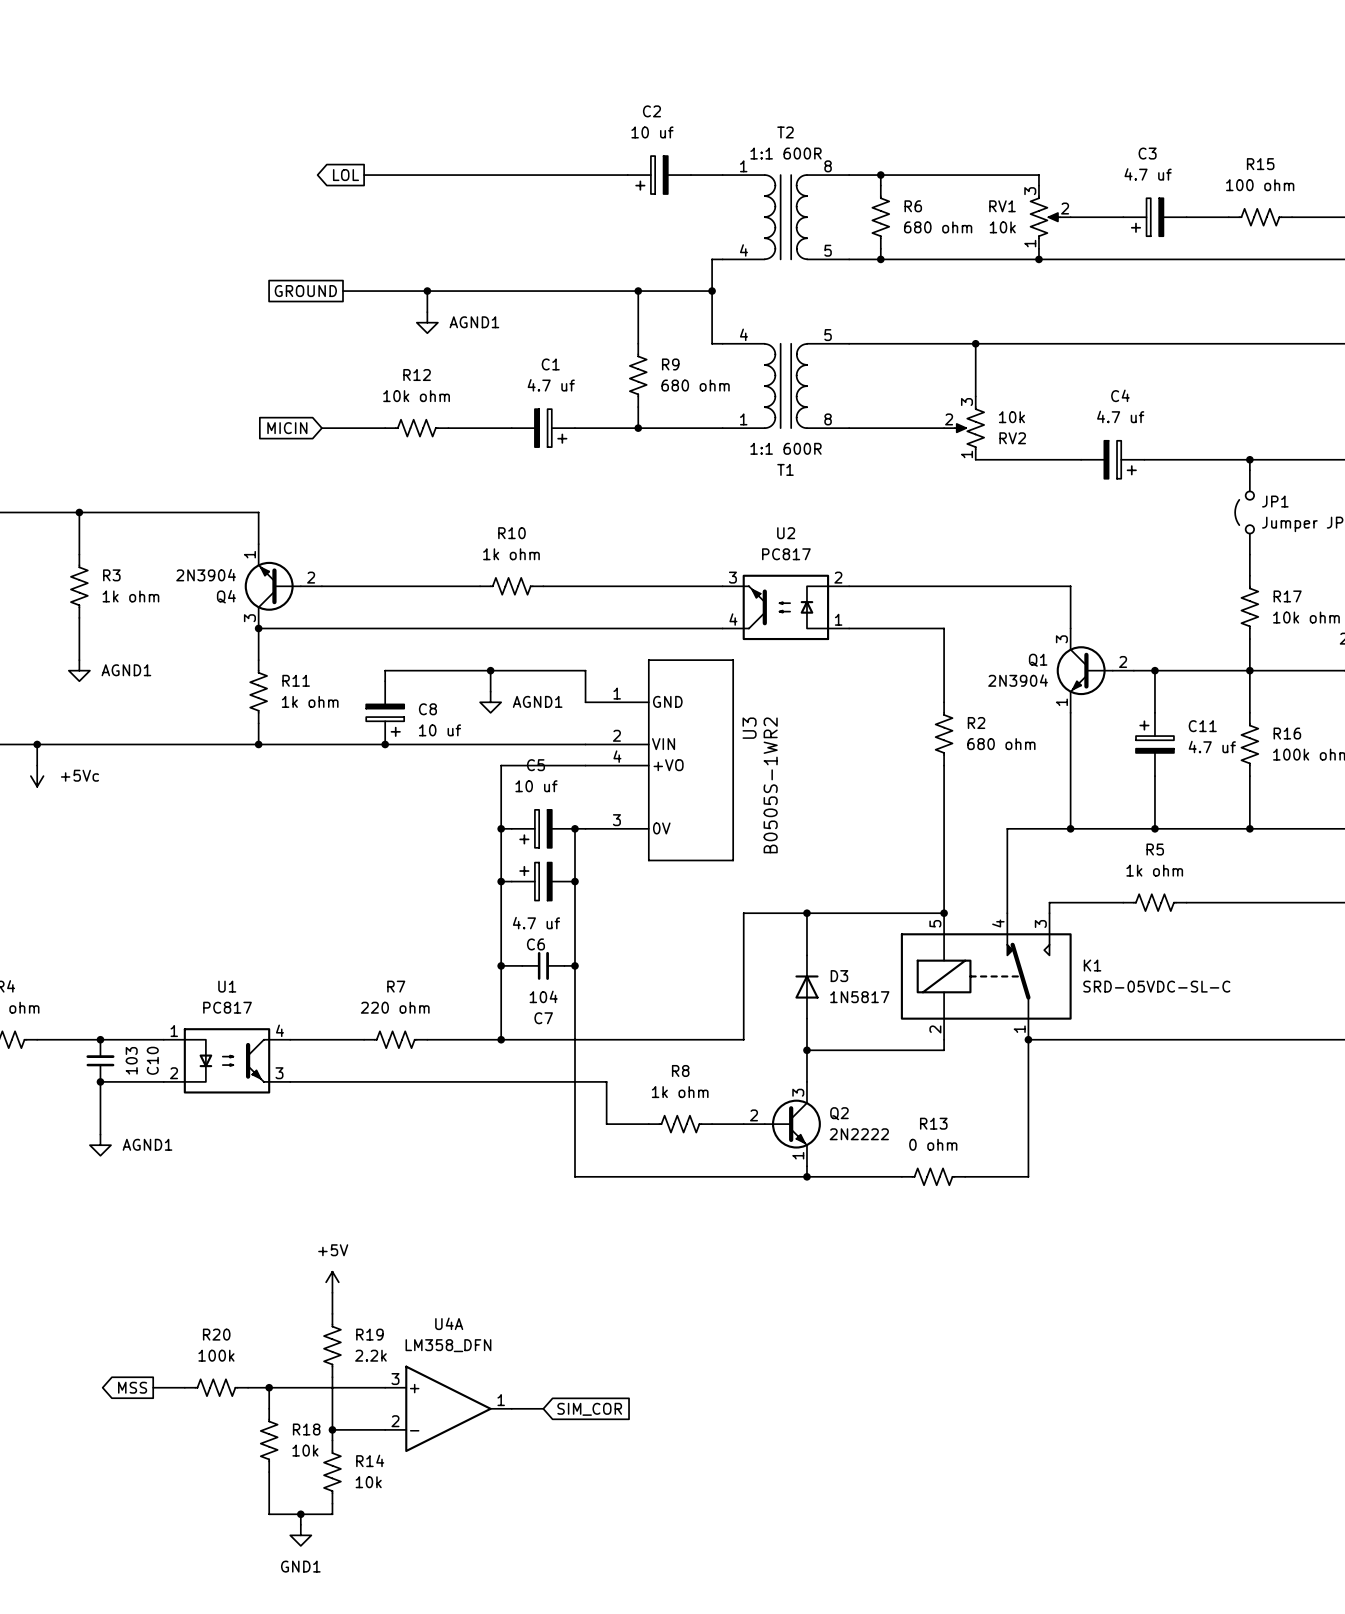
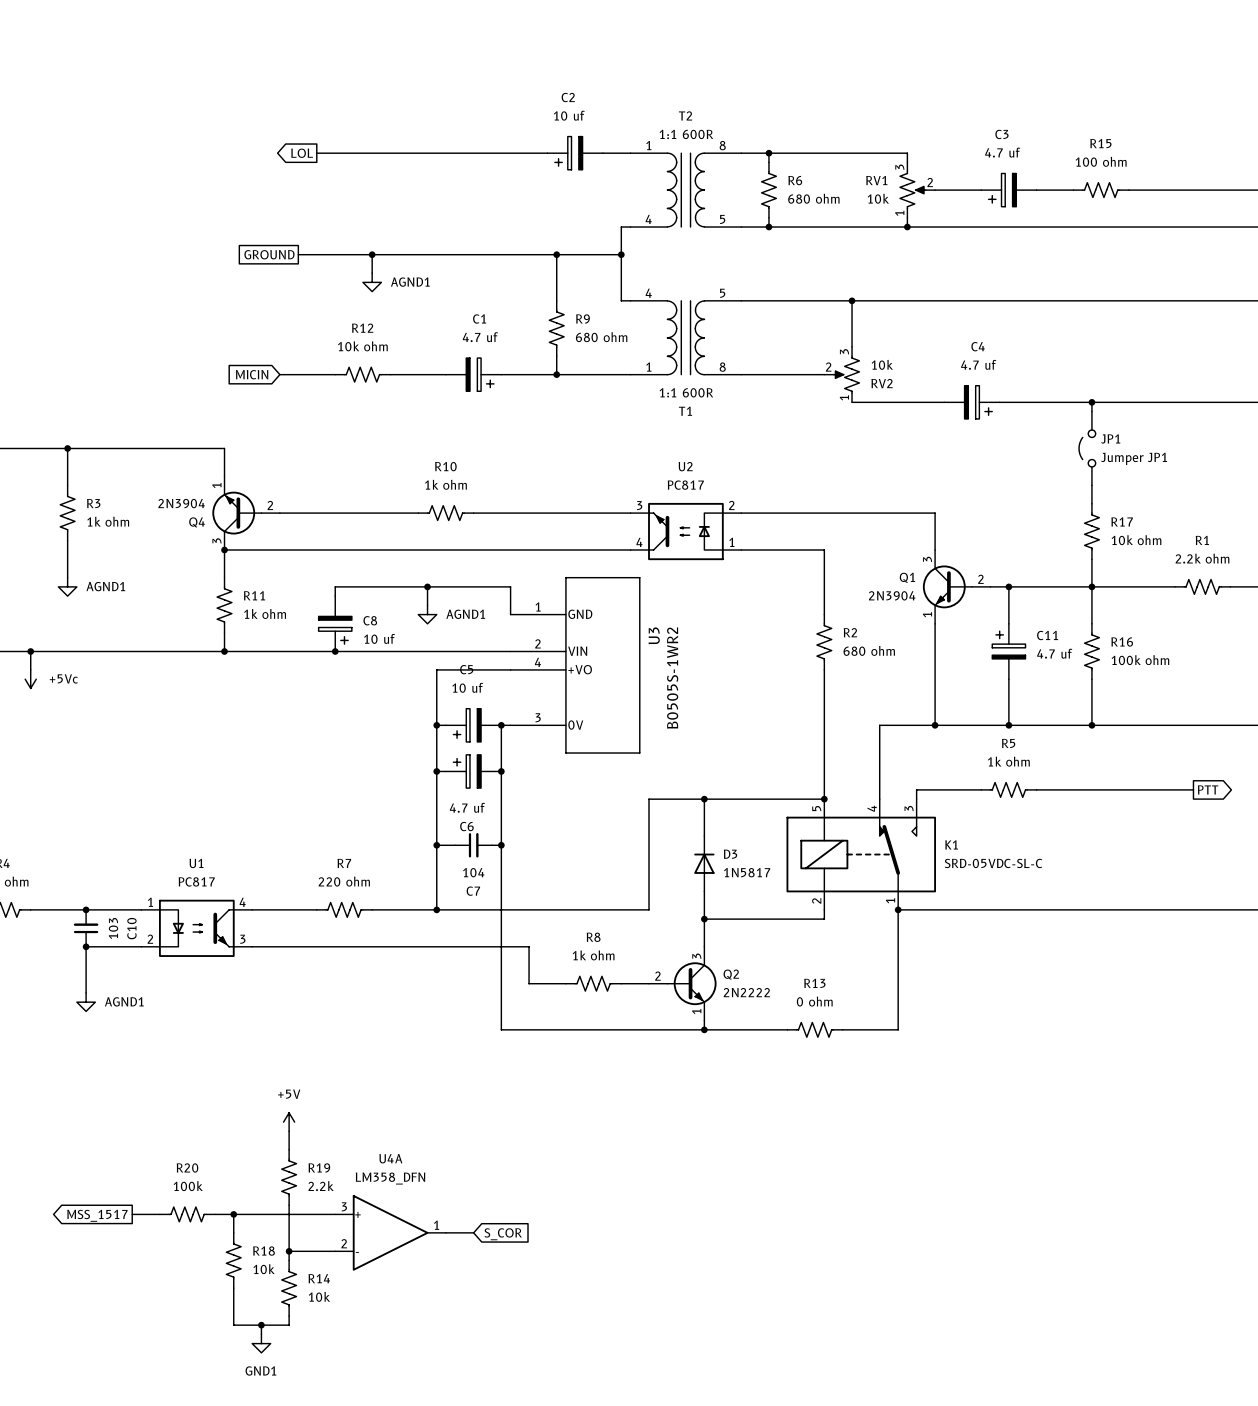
global label: MSS (132, 1387) -> MSS_1517 (97, 1215)
global label: SIM_COR (589, 1409) -> S_COR (503, 1234)

